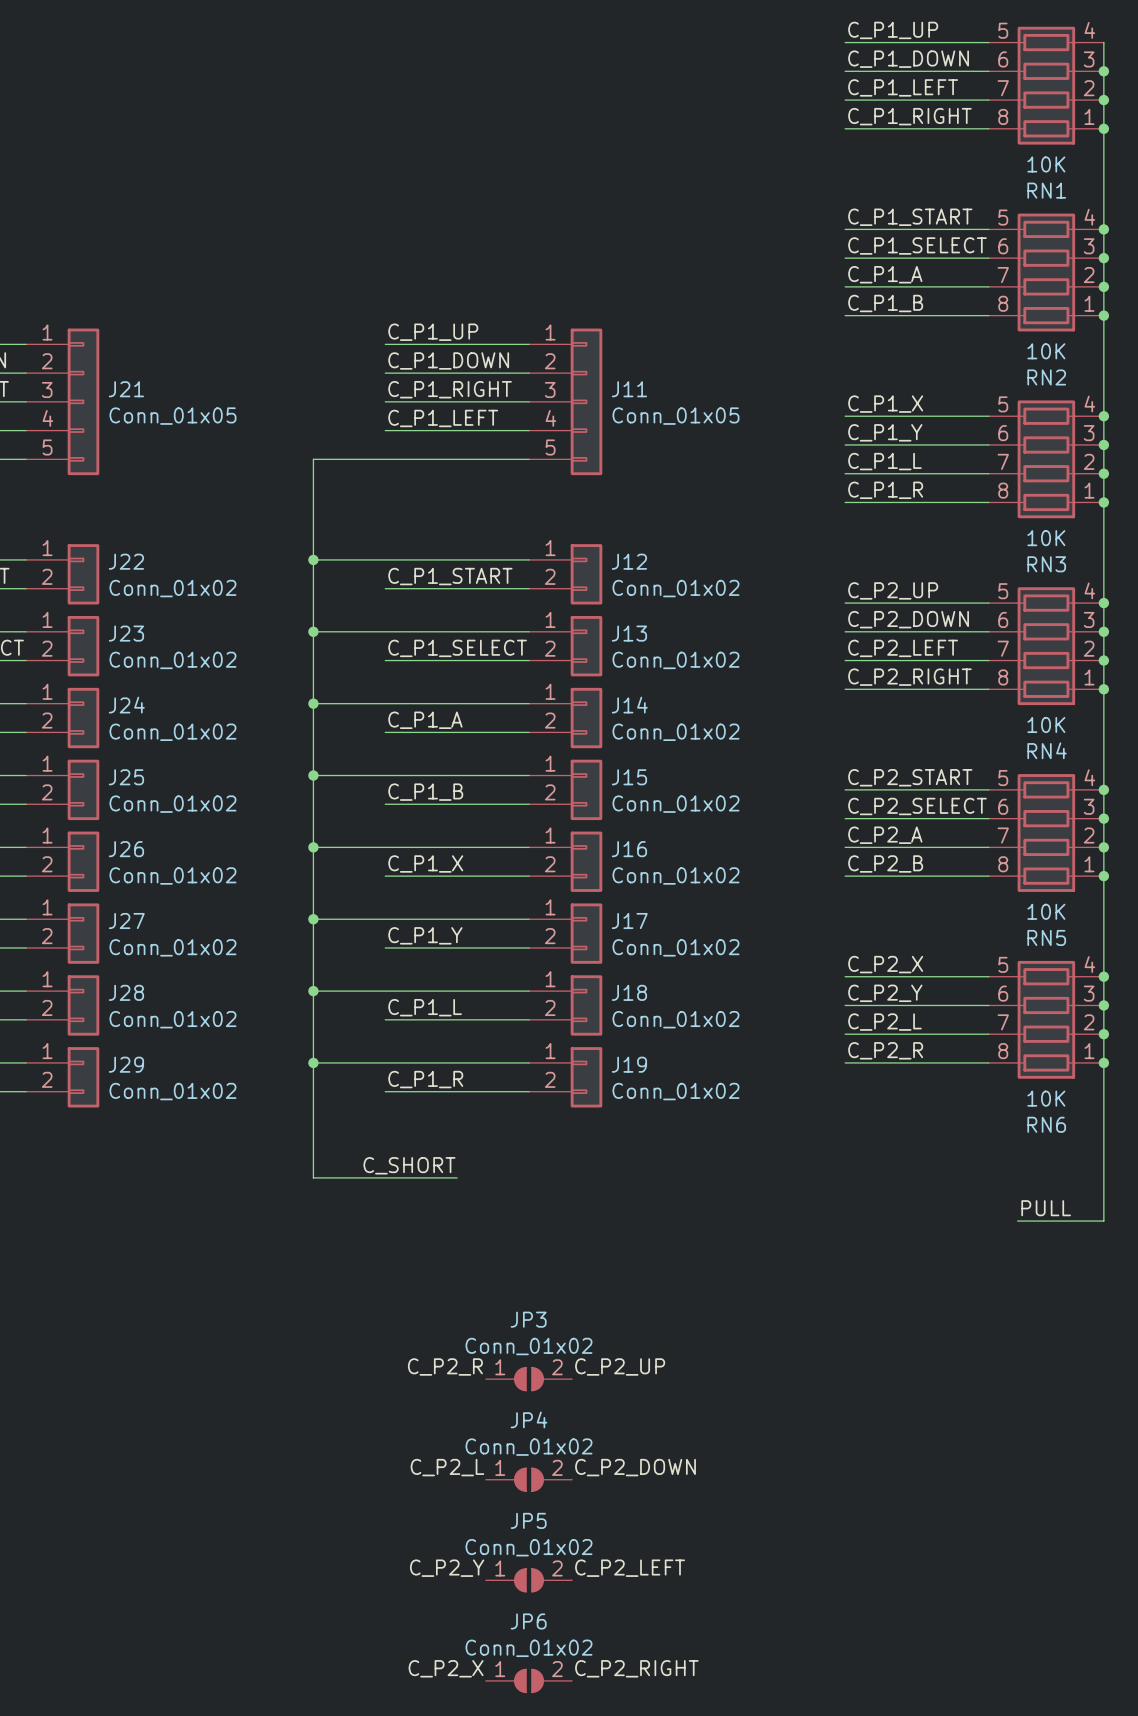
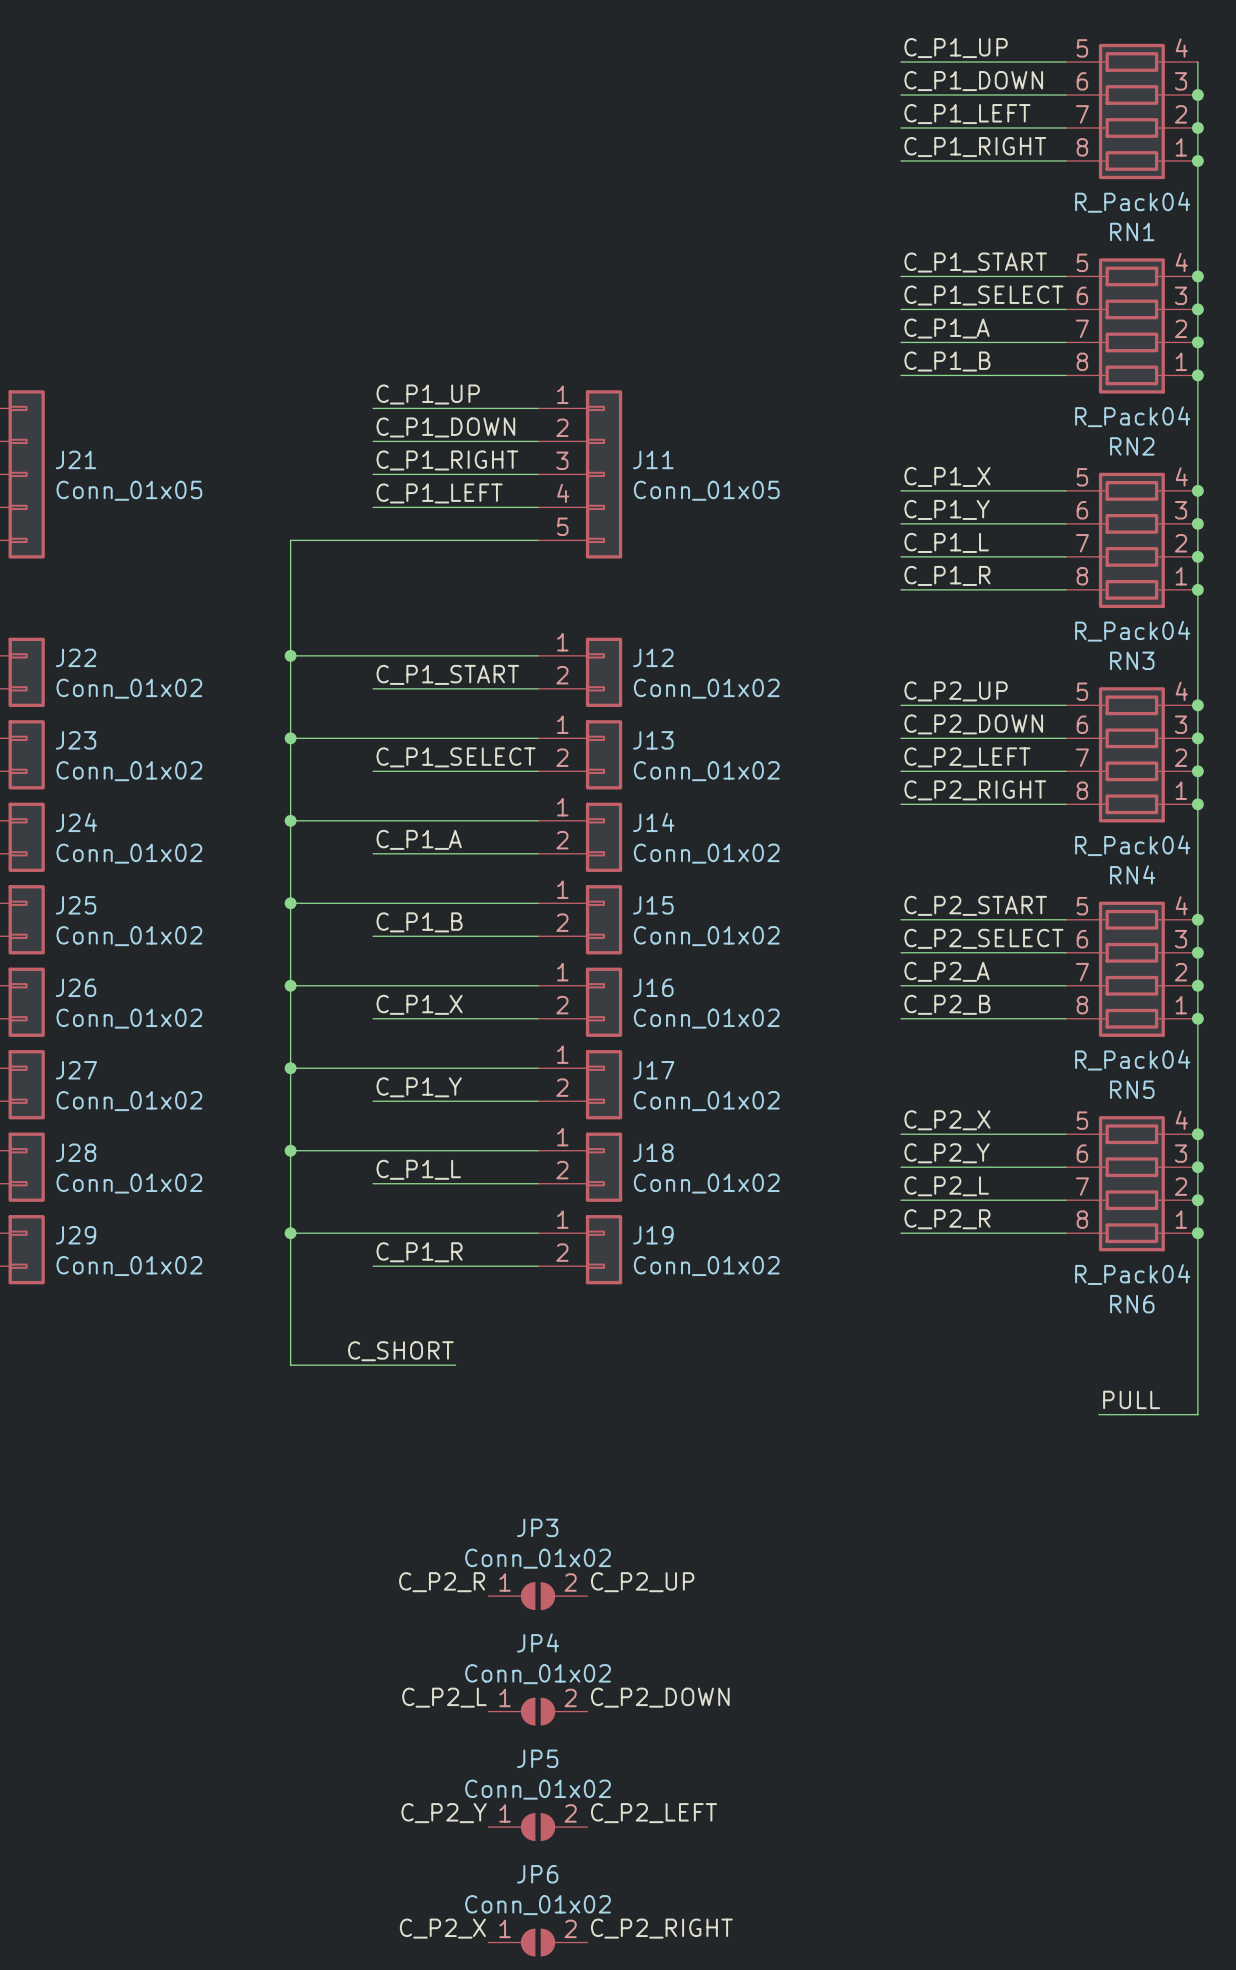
RN1 value: 10K (1046, 164) -> R_Pack04 (1132, 202)
RN2 value: 10K (1046, 351) -> R_Pack04 (1132, 416)
RN3 value: 10K (1046, 538) -> R_Pack04 (1132, 631)
RN4 value: 10K (1046, 724) -> R_Pack04 (1132, 845)
RN5 value: 10K (1046, 911) -> R_Pack04 (1132, 1060)
RN6 value: 10K (1046, 1098) -> R_Pack04 (1132, 1274)

